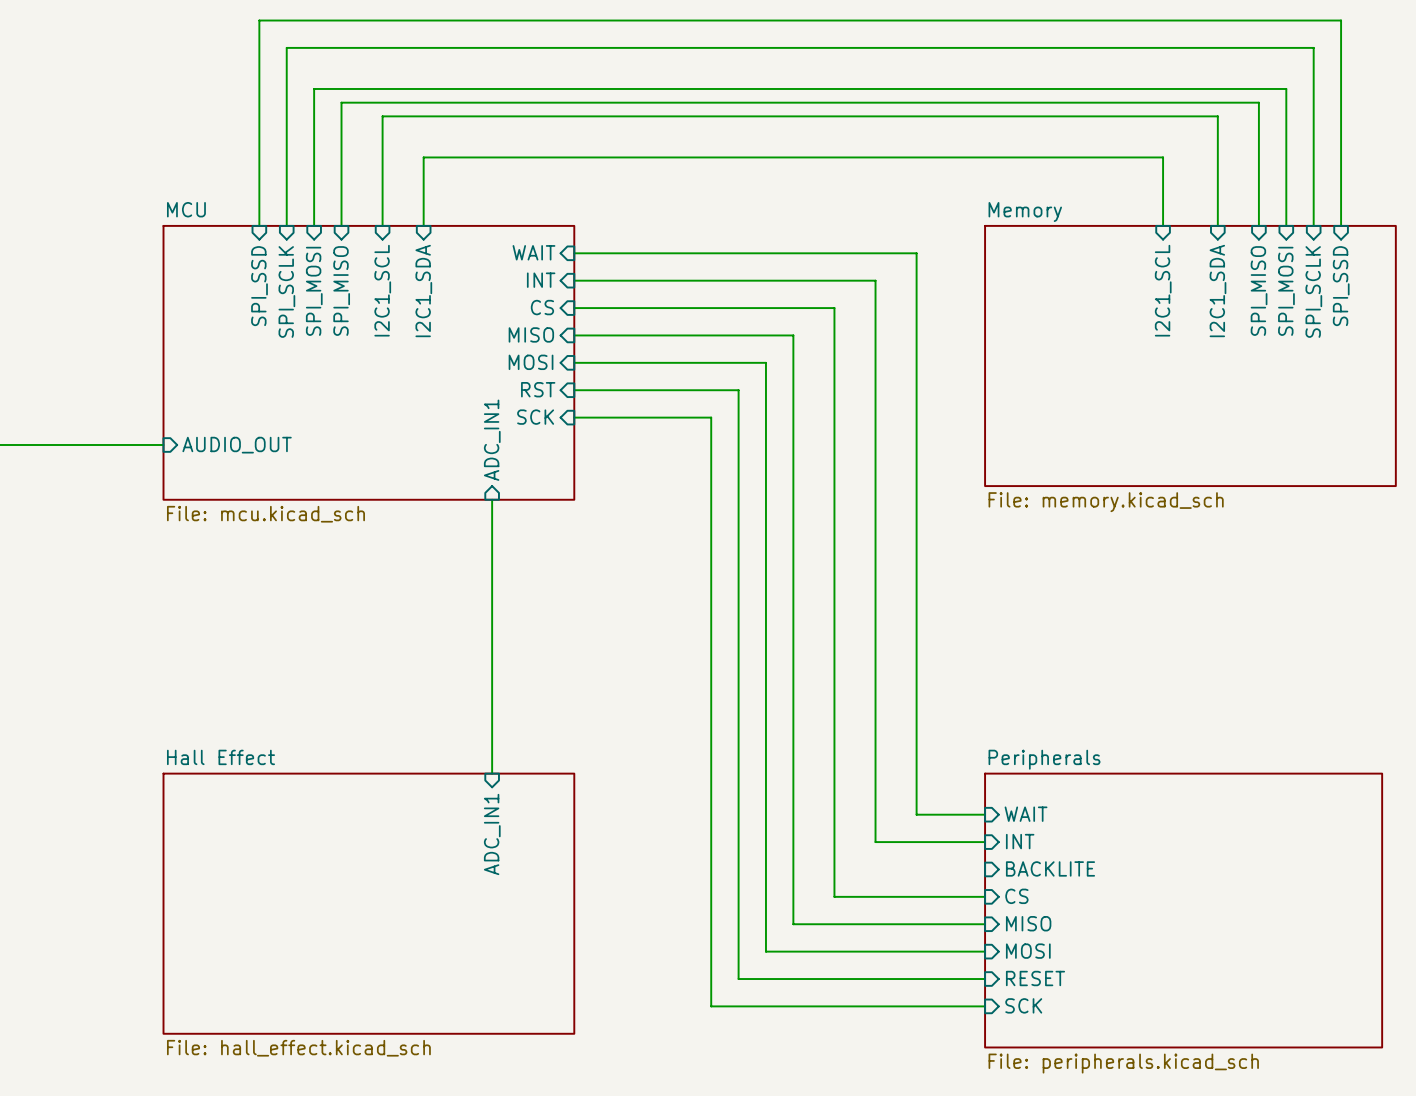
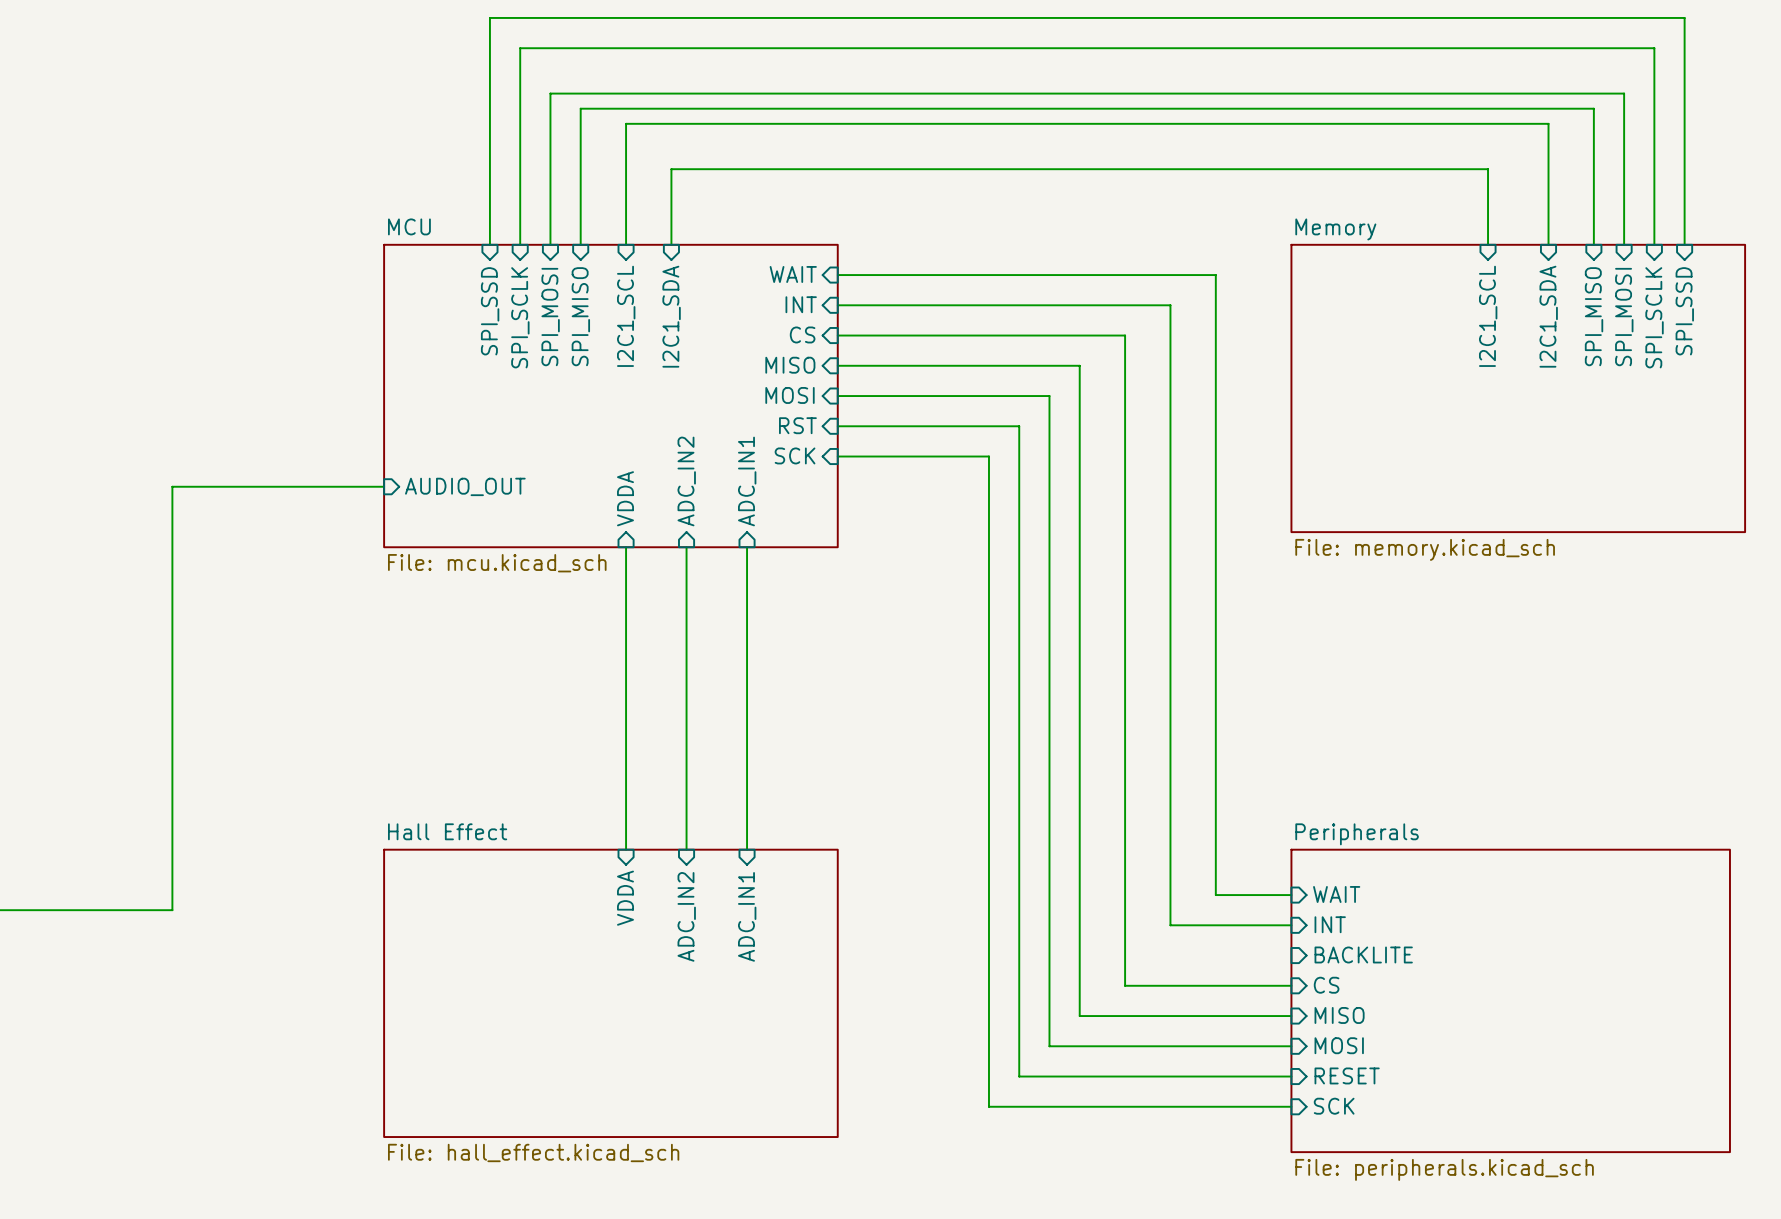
sheet pin: none -> ADC_IN2 (686, 481)
sheet pin: none -> VDDA (625, 498)
wire: none -> (626, 547) (626, 849)
wire: none -> (686, 547) (686, 849)
sheet pin: none -> VDDA (625, 898)
sheet pin: none -> ADC_IN2 (686, 916)

